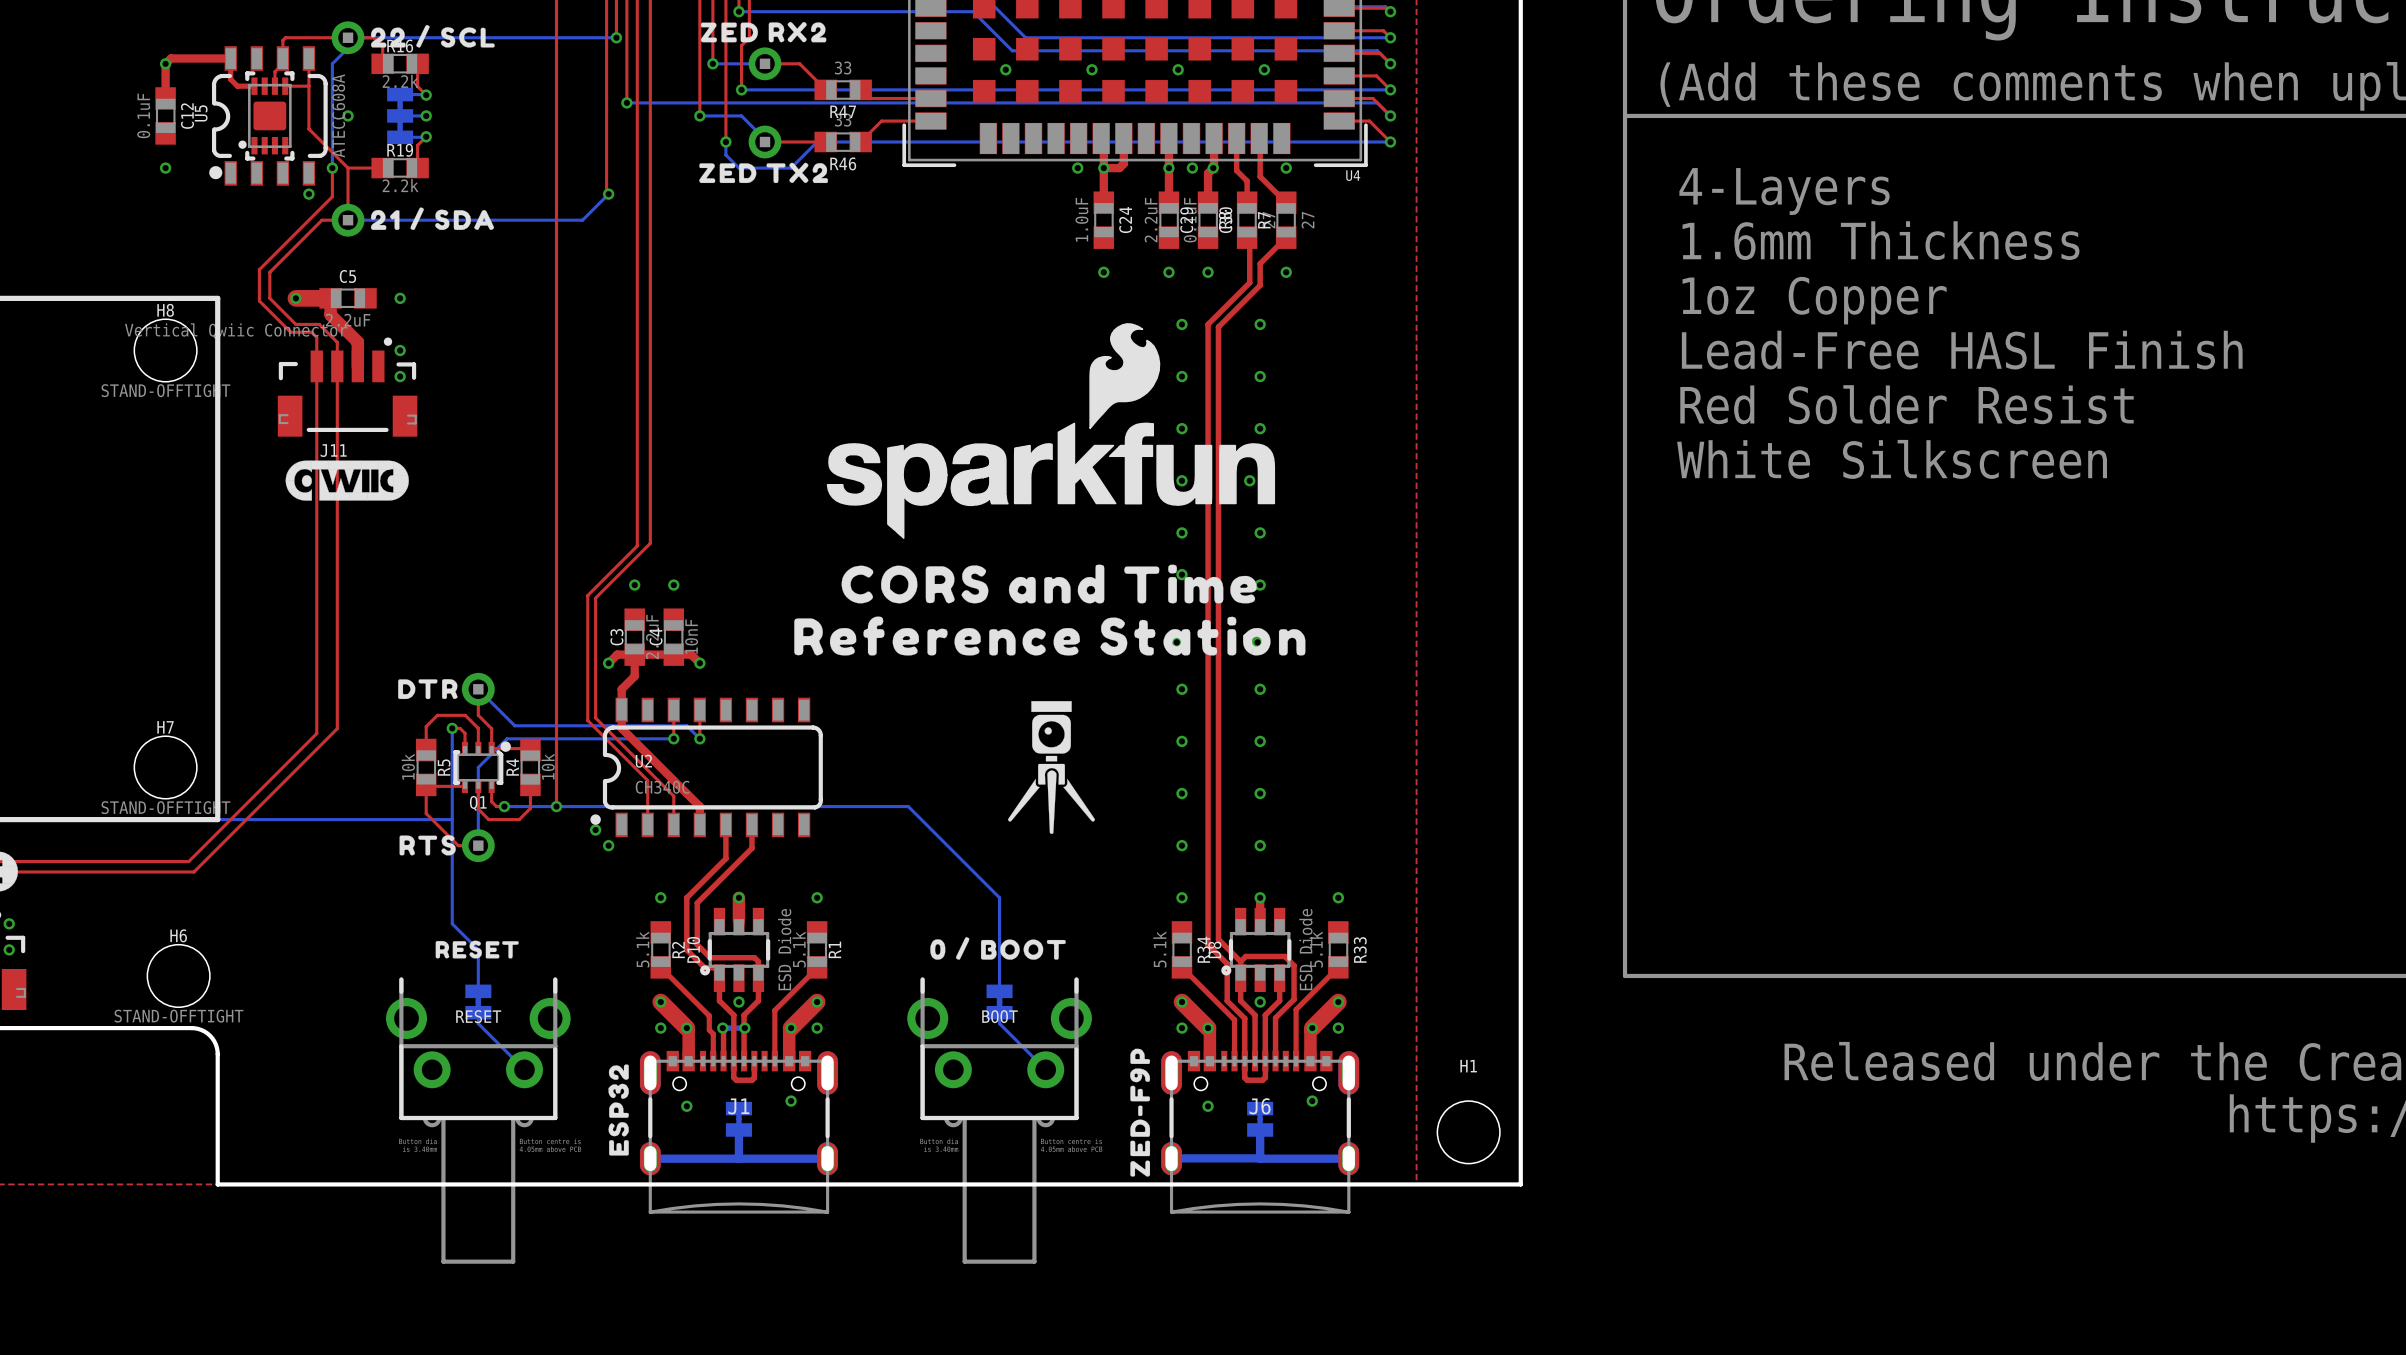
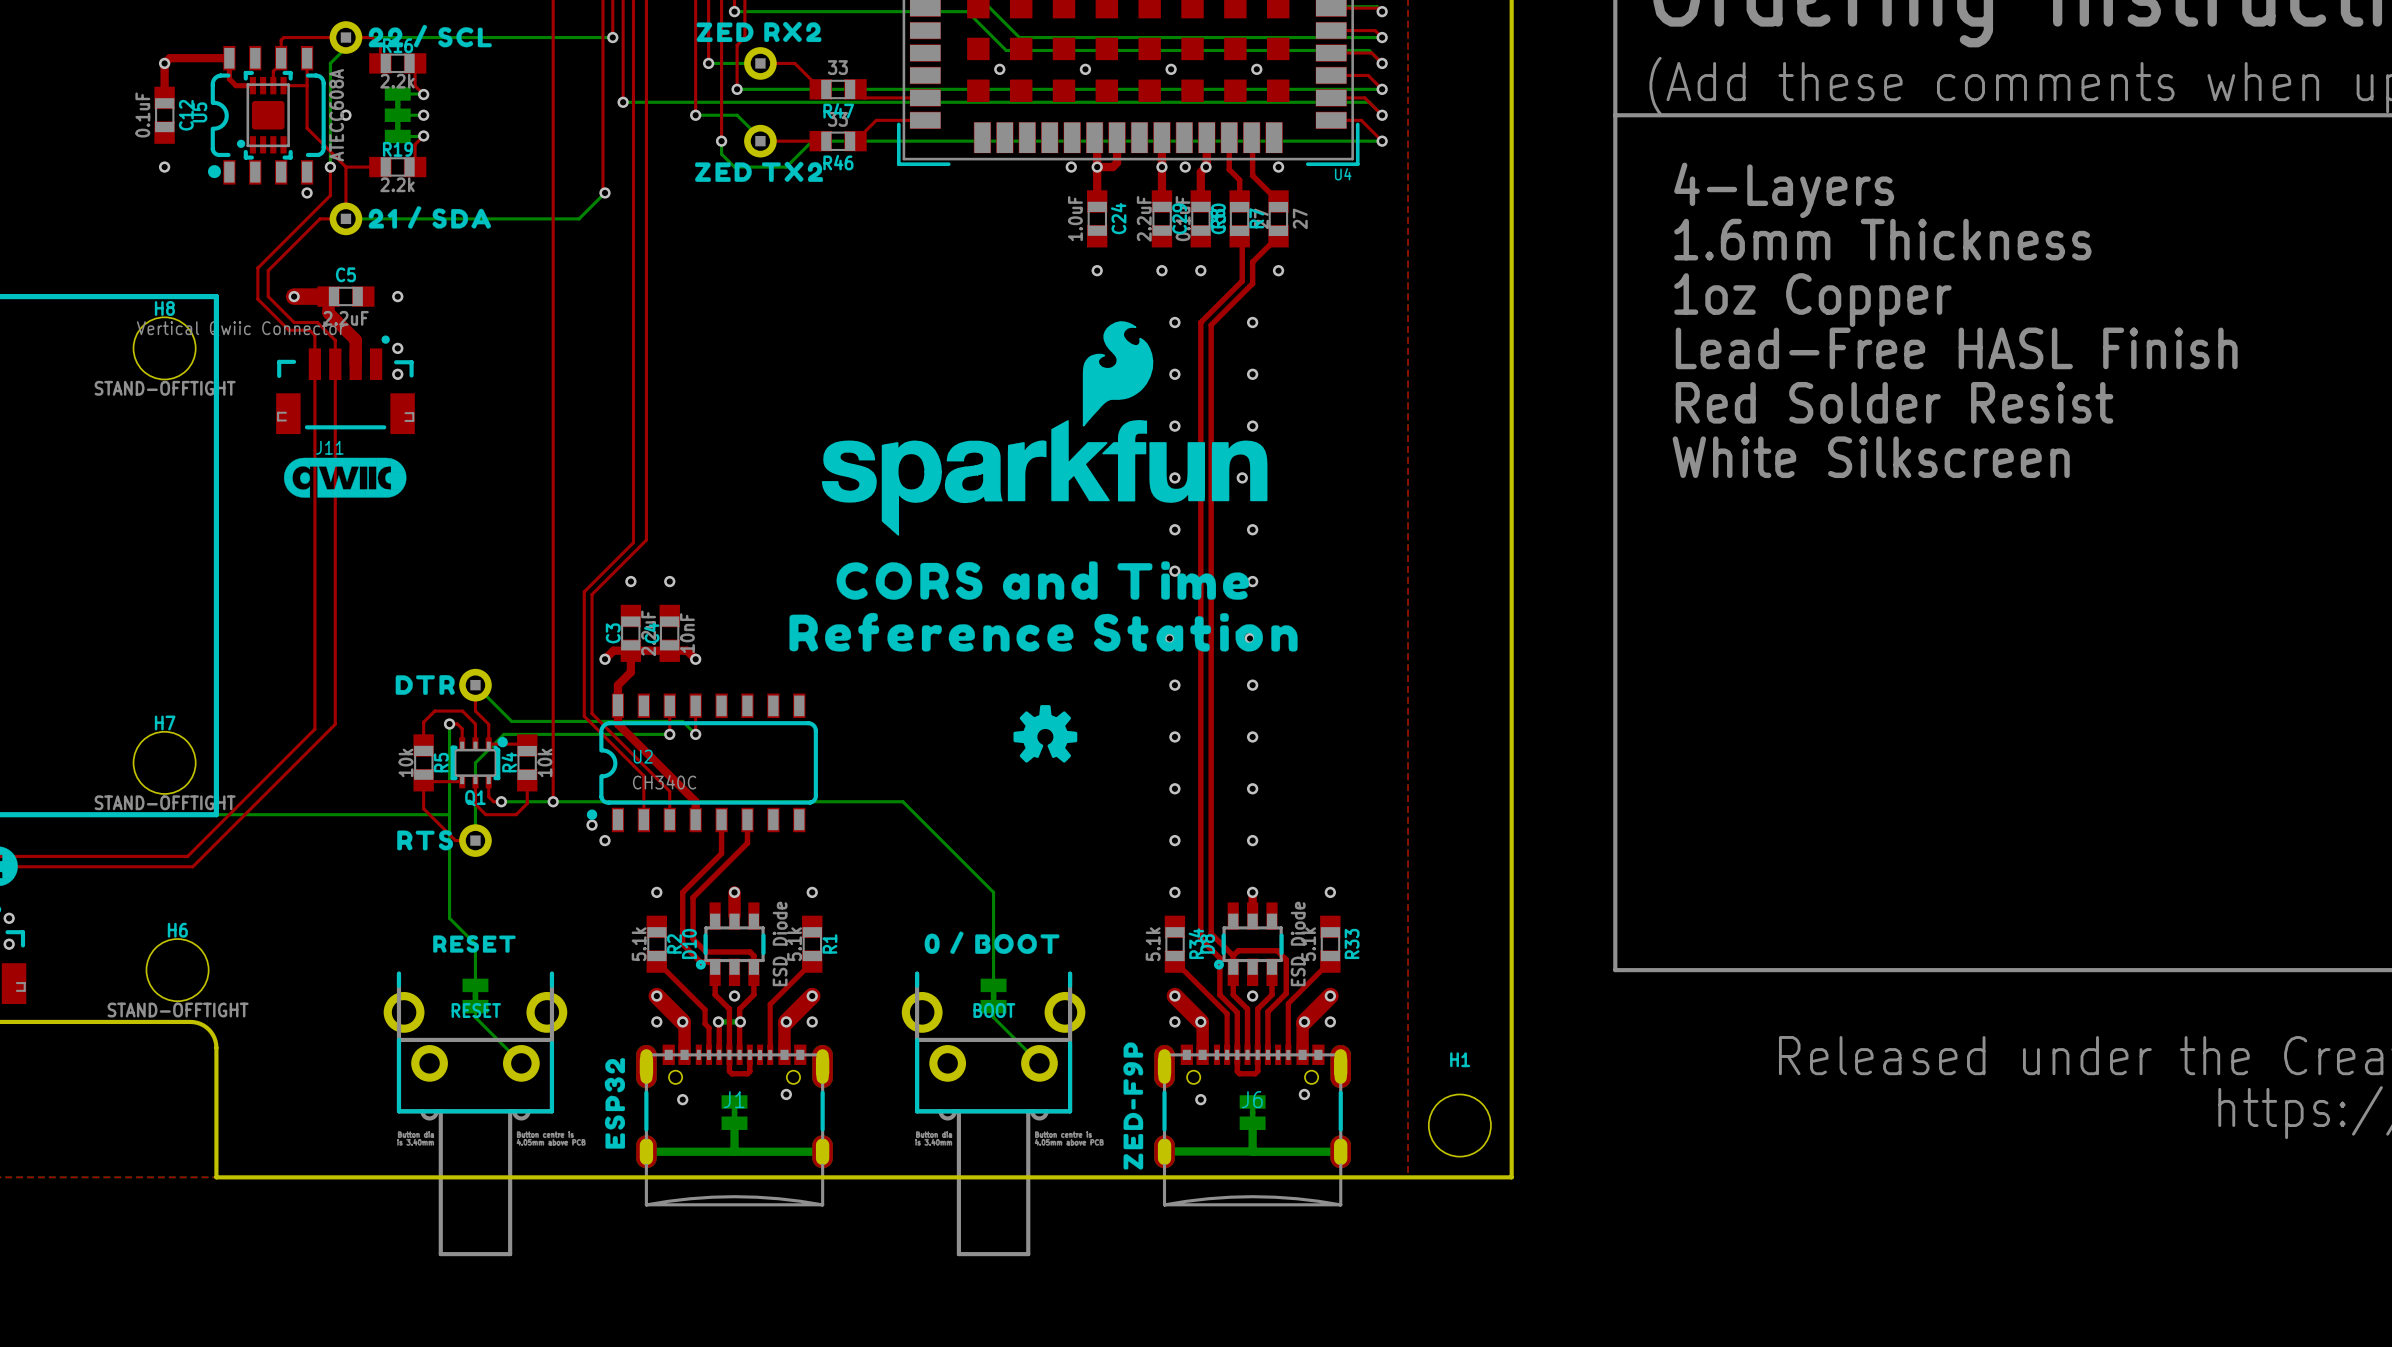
drawing: [1008, 701, 1095, 834] -> none
drawing: none -> [1013, 705, 1078, 763]

